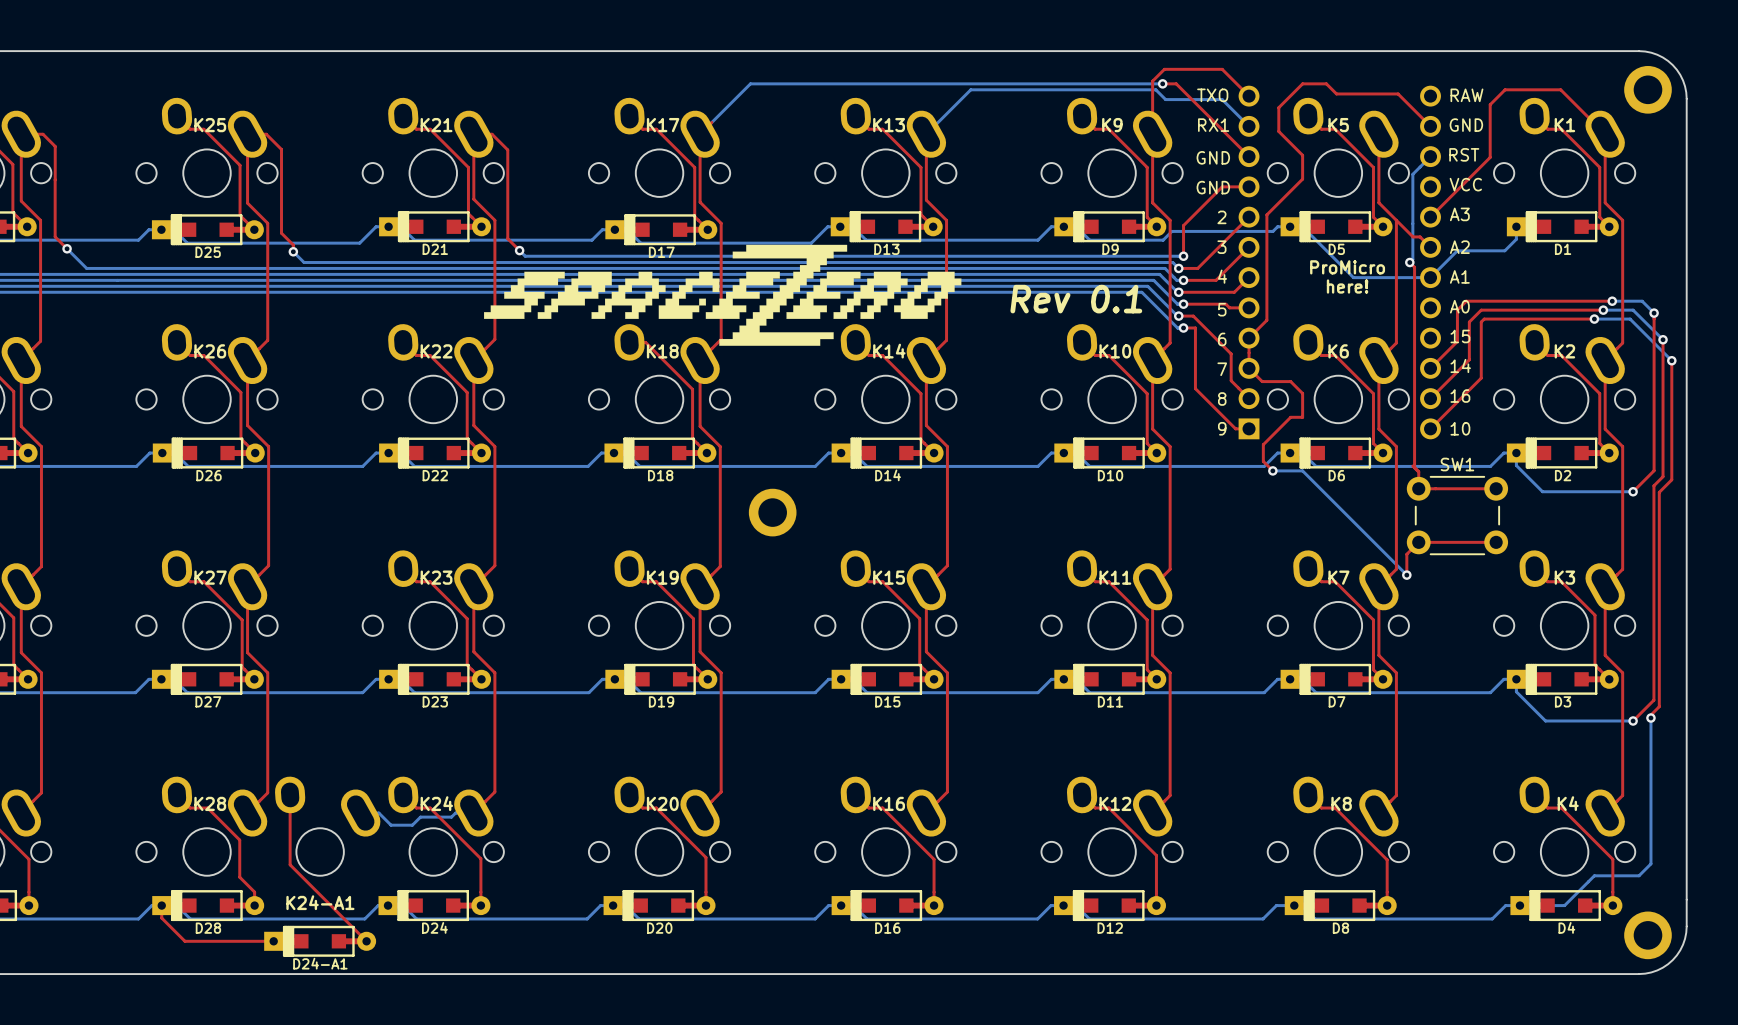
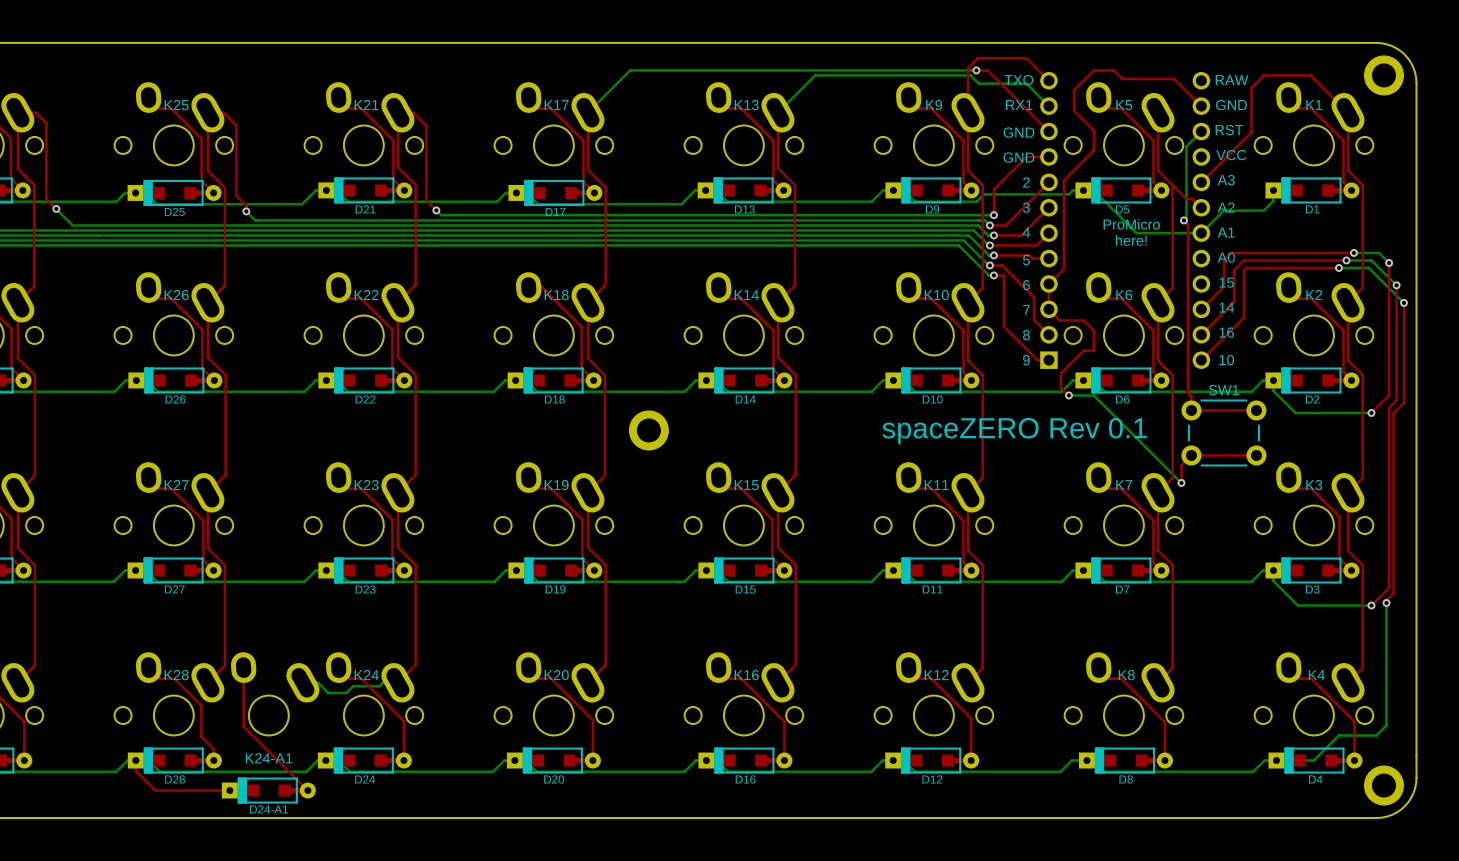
drawing: [484, 244, 962, 346] -> none
text: Rev 0.1 (1076, 299) -> none
text: none -> spaceZERO Rev 0.1 (1014, 431)

